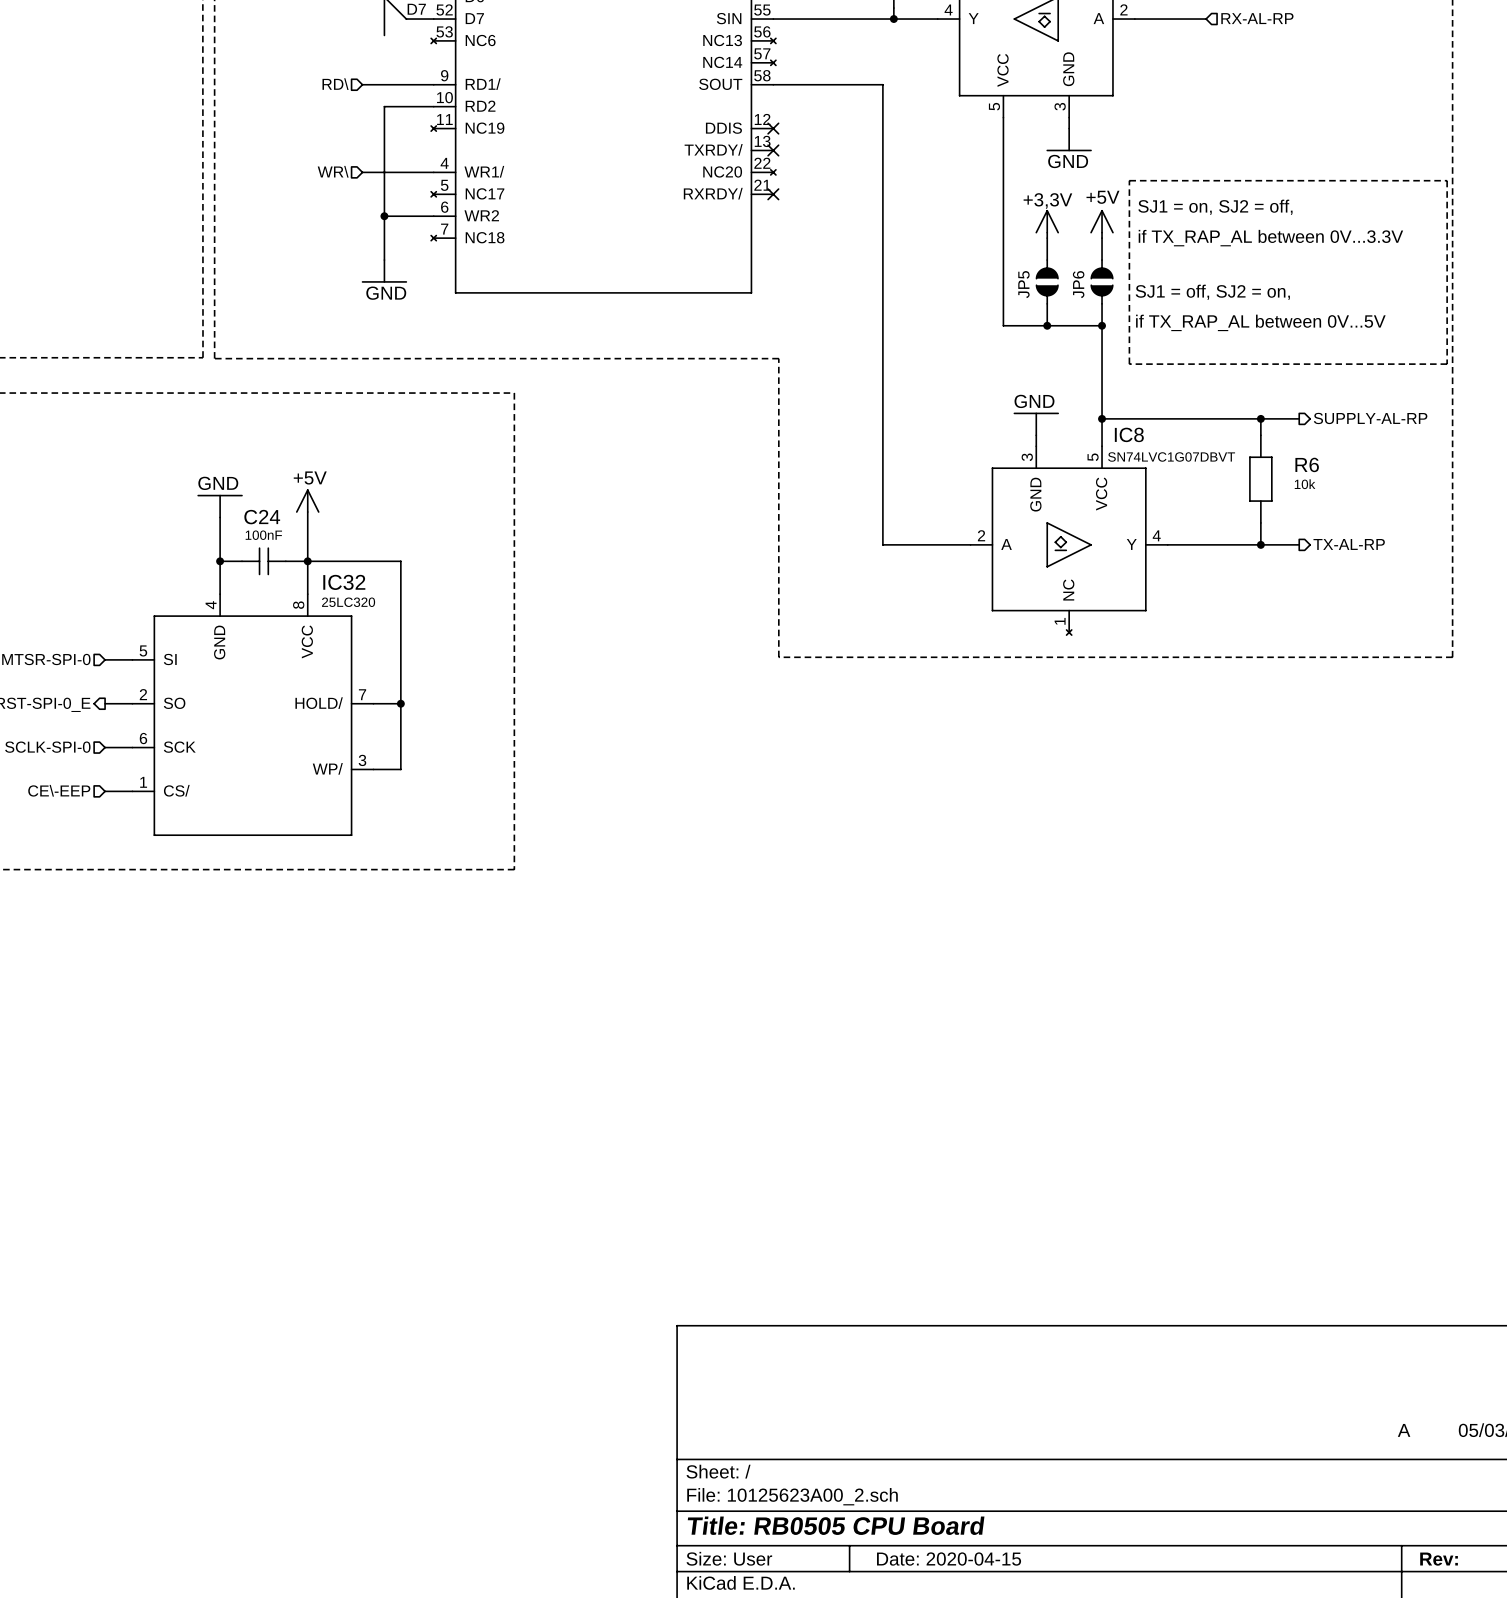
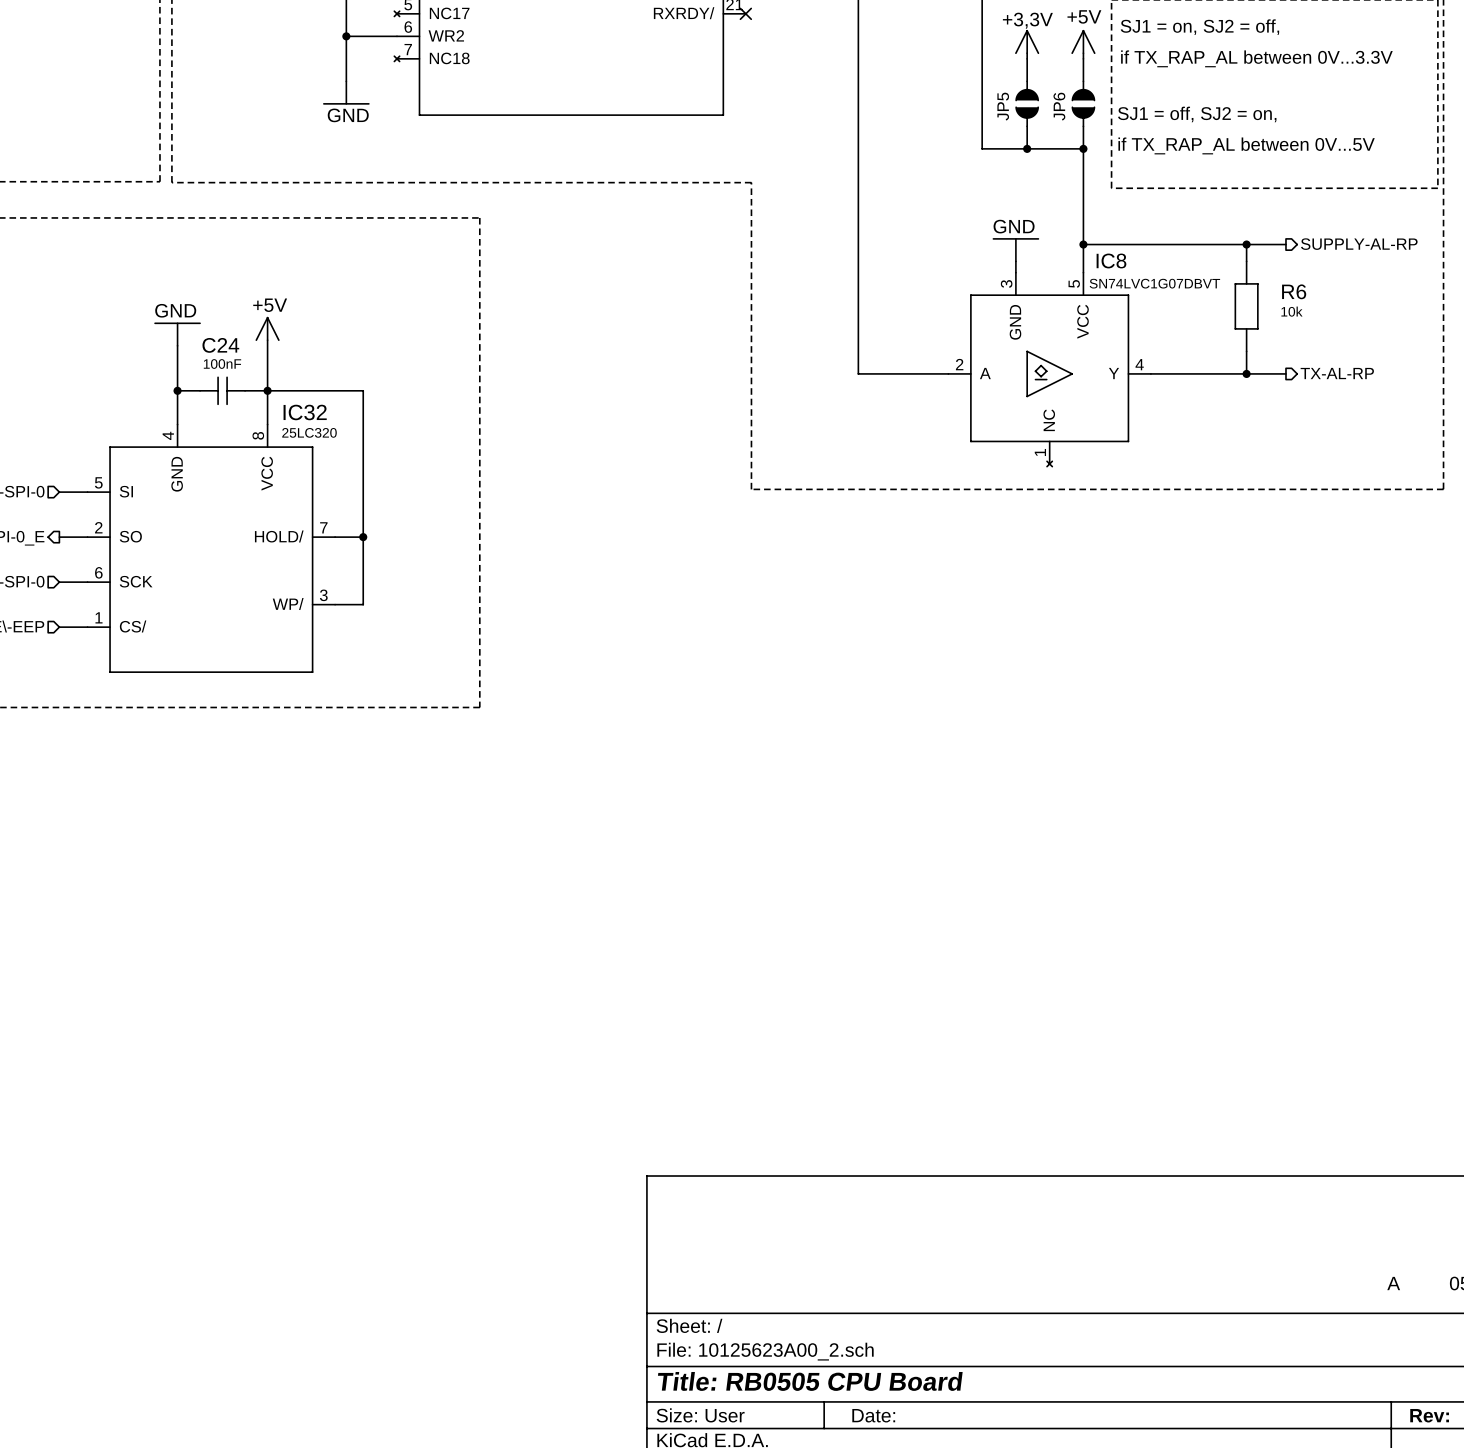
title block: Date: 2020-04-15 (949, 1559) -> Date: (873, 1415)

